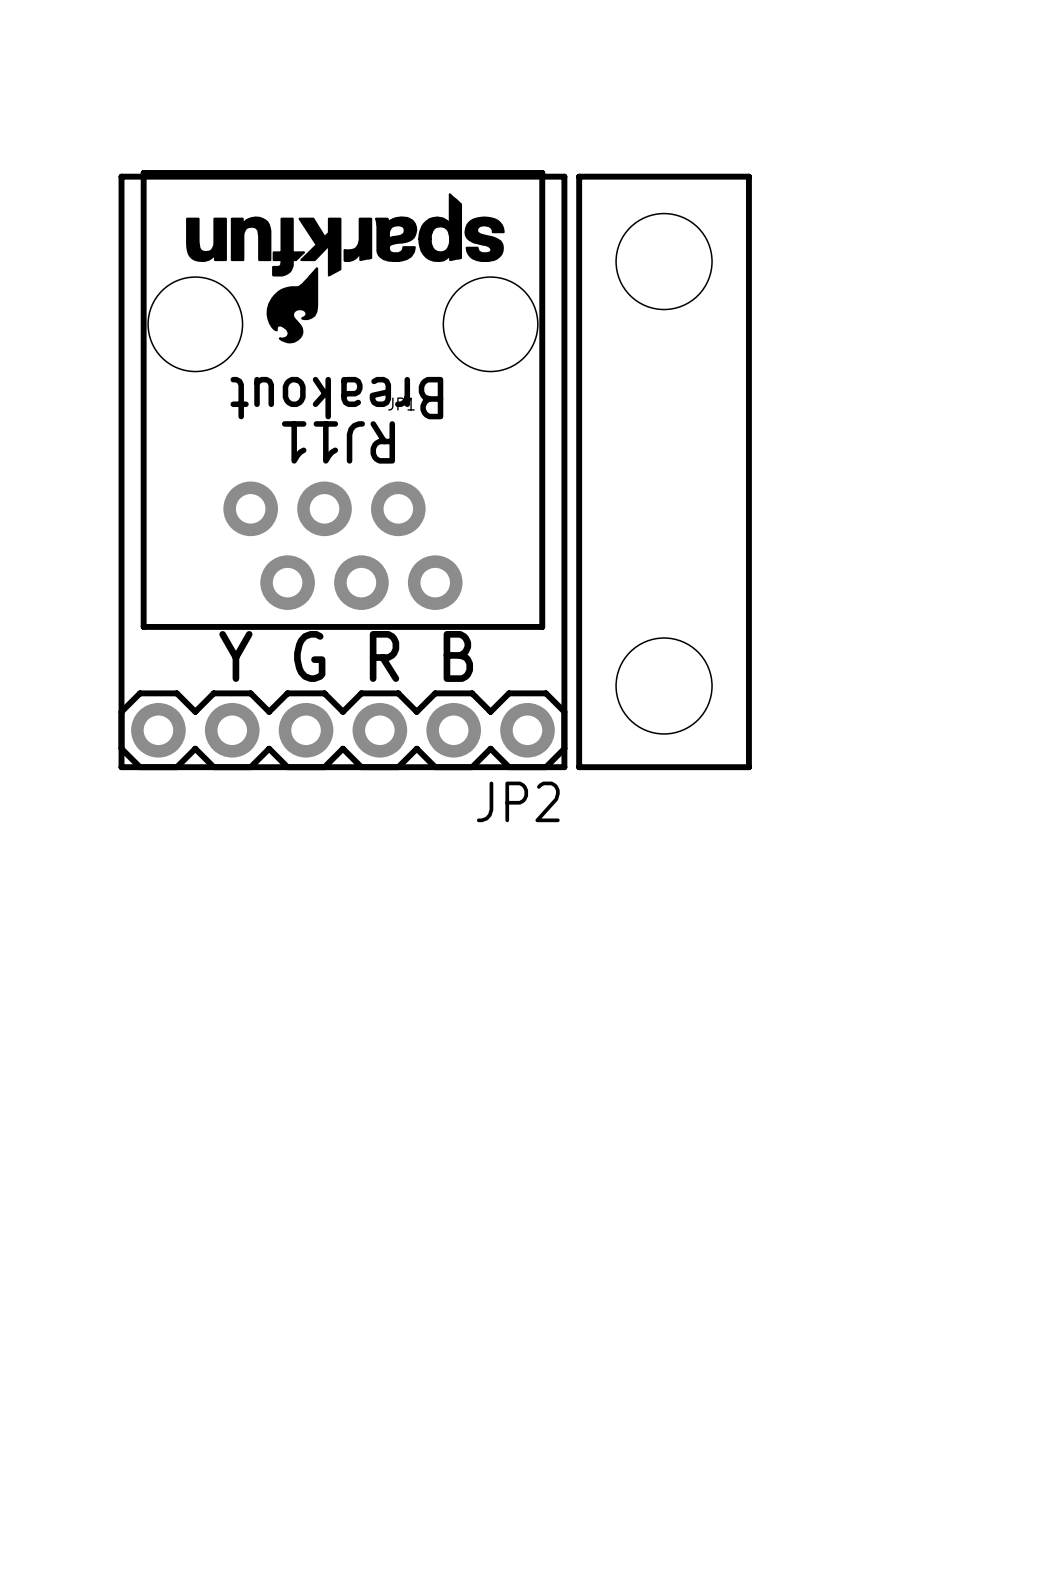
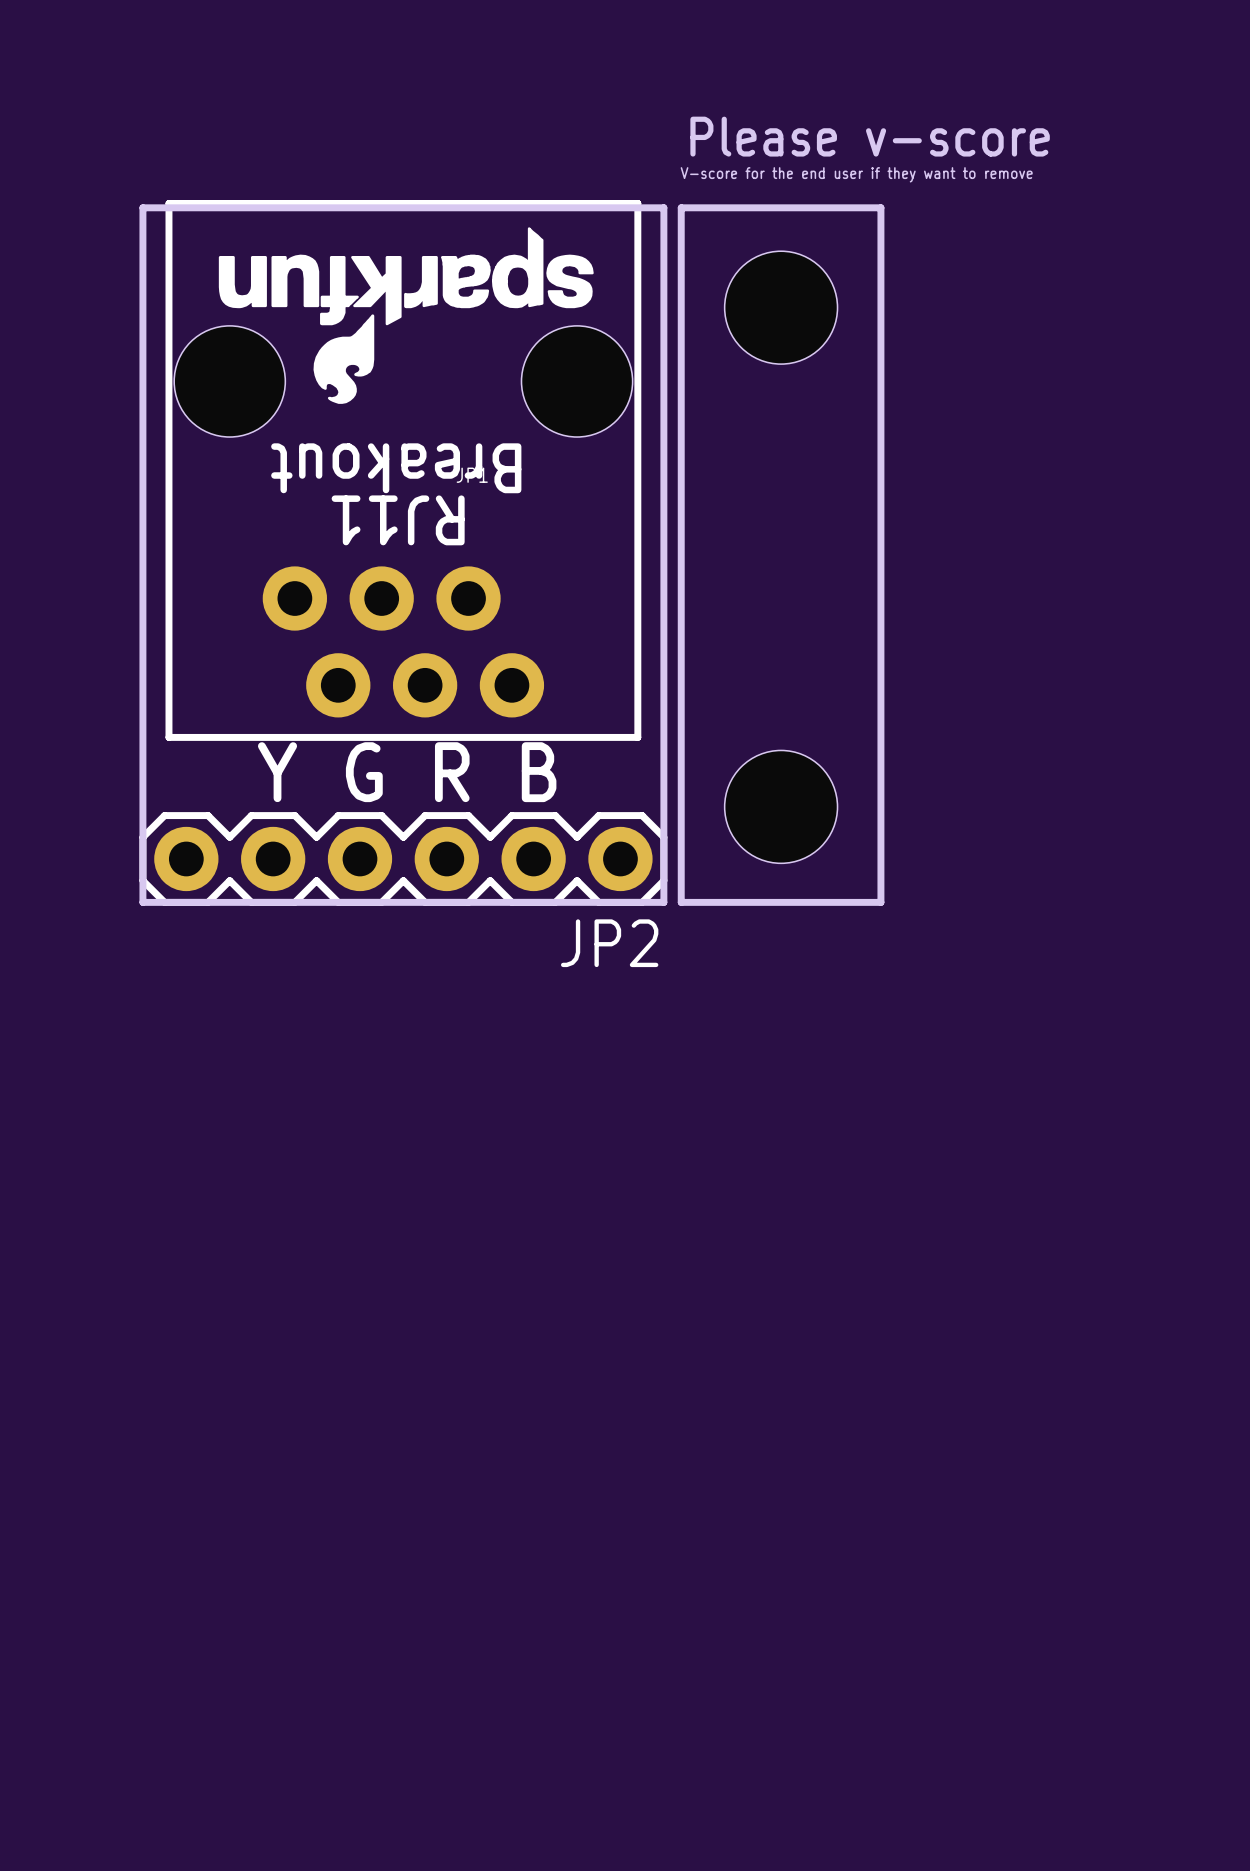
text: none -> Please v-score (870, 136)
text: none -> V-score for the end user if they want to remove (856, 174)

